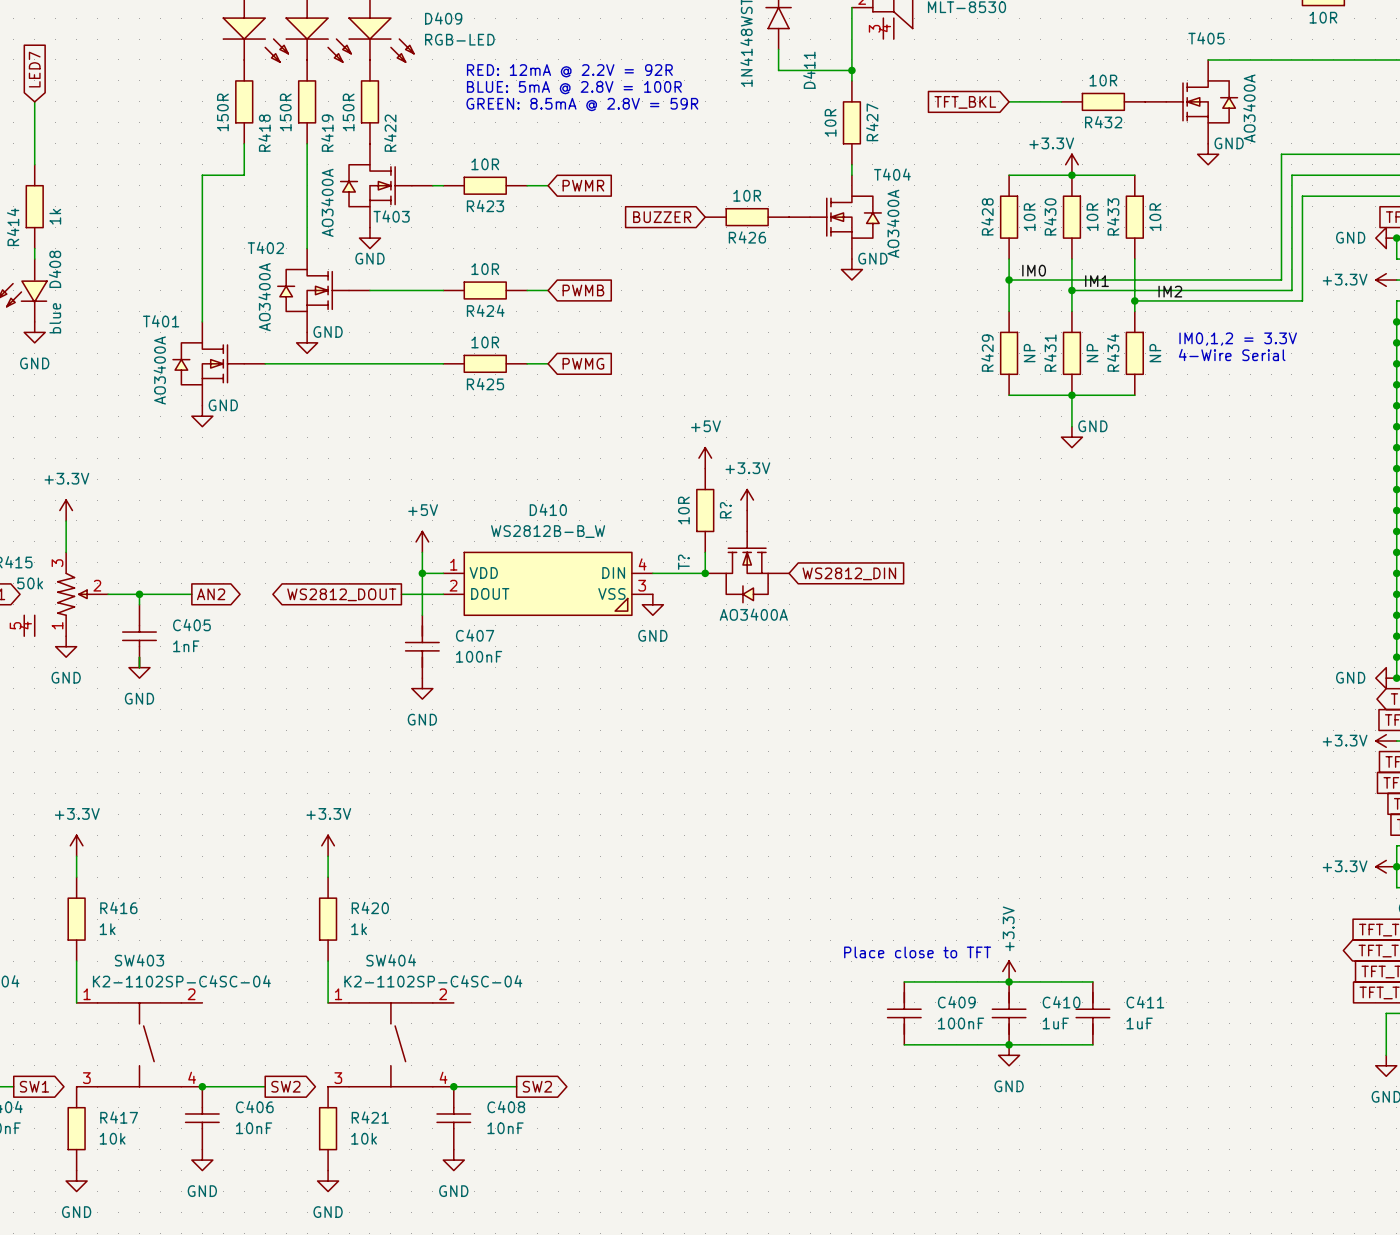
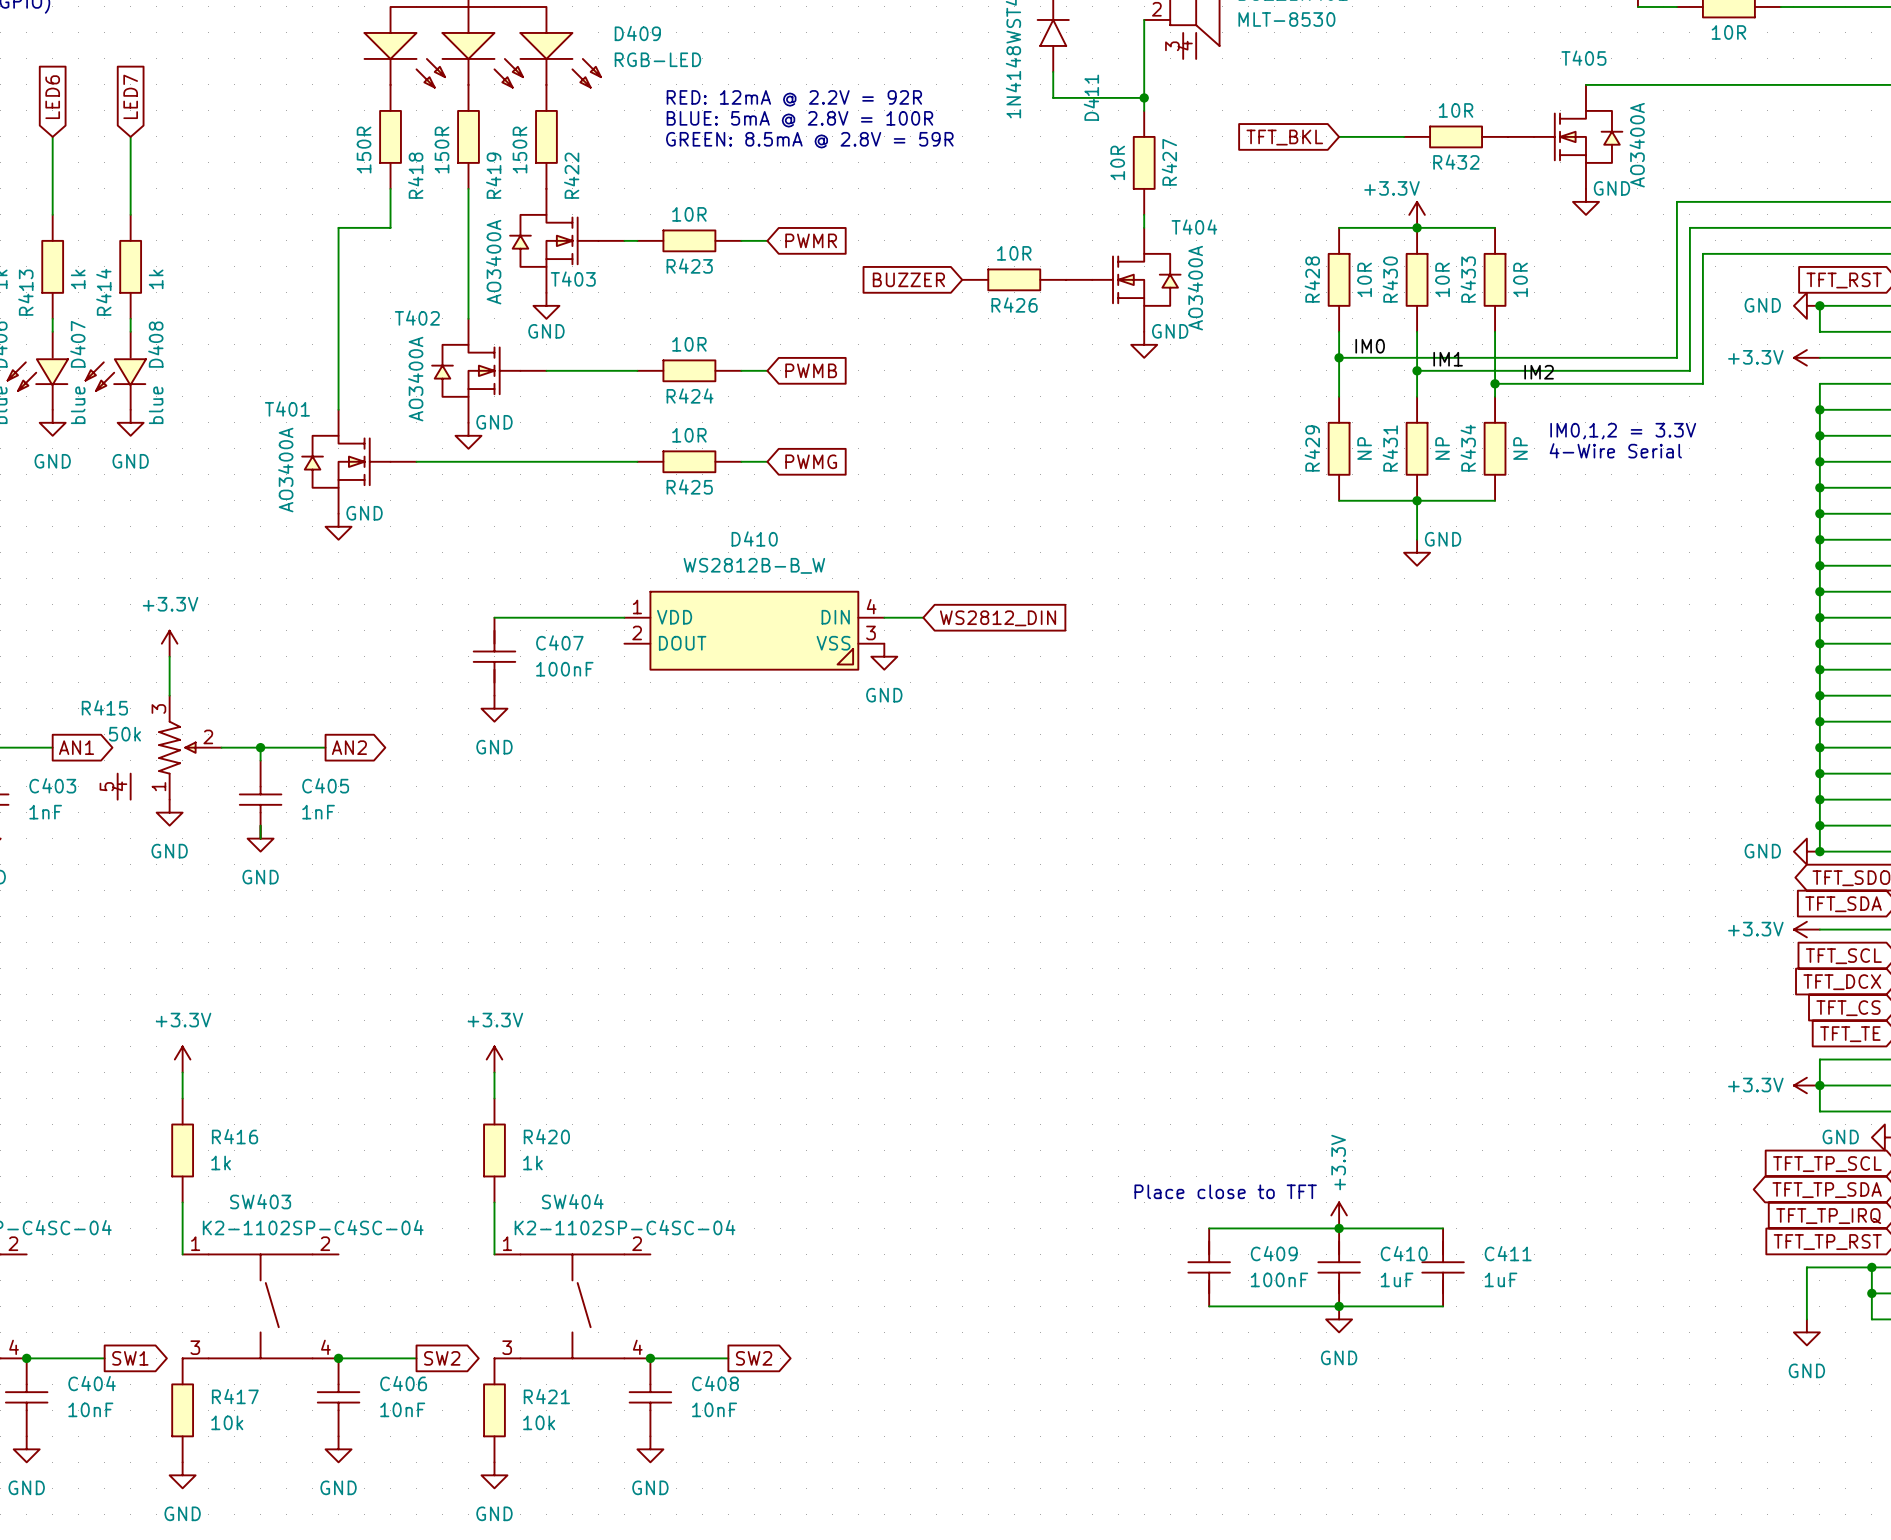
power symbol: +5V (705, 458) -> none
wire: none -> (494, 617) (624, 617)
wire: none -> (884, 617) (923, 617)
power symbol: +3.3V (747, 500) -> none
R?: 10R (705, 510) -> none
power symbol: +5V (422, 541) -> none
wire: (422, 552) (422, 615) -> none
wire: (705, 552) (705, 573) (652, 573) -> none
T?: AO3400A (747, 556) -> none
power symbol: none -> GND (494, 708)
wire: (422, 573) (443, 573) -> none
junction: (422, 573) -> none
junction: (705, 573) -> none
global label position: WS2812_DIN (849, 573) -> WS2812_DIN (998, 618)
D410 position: (548, 583) -> (754, 630)
global label: WS2812_DOUT (341, 594) -> none
wire: (401, 594) (443, 594) -> none
power symbol position: GND (652, 604) -> GND (884, 656)
C407 position: (422, 646) -> (494, 656)
power symbol: GND (422, 688) -> none

